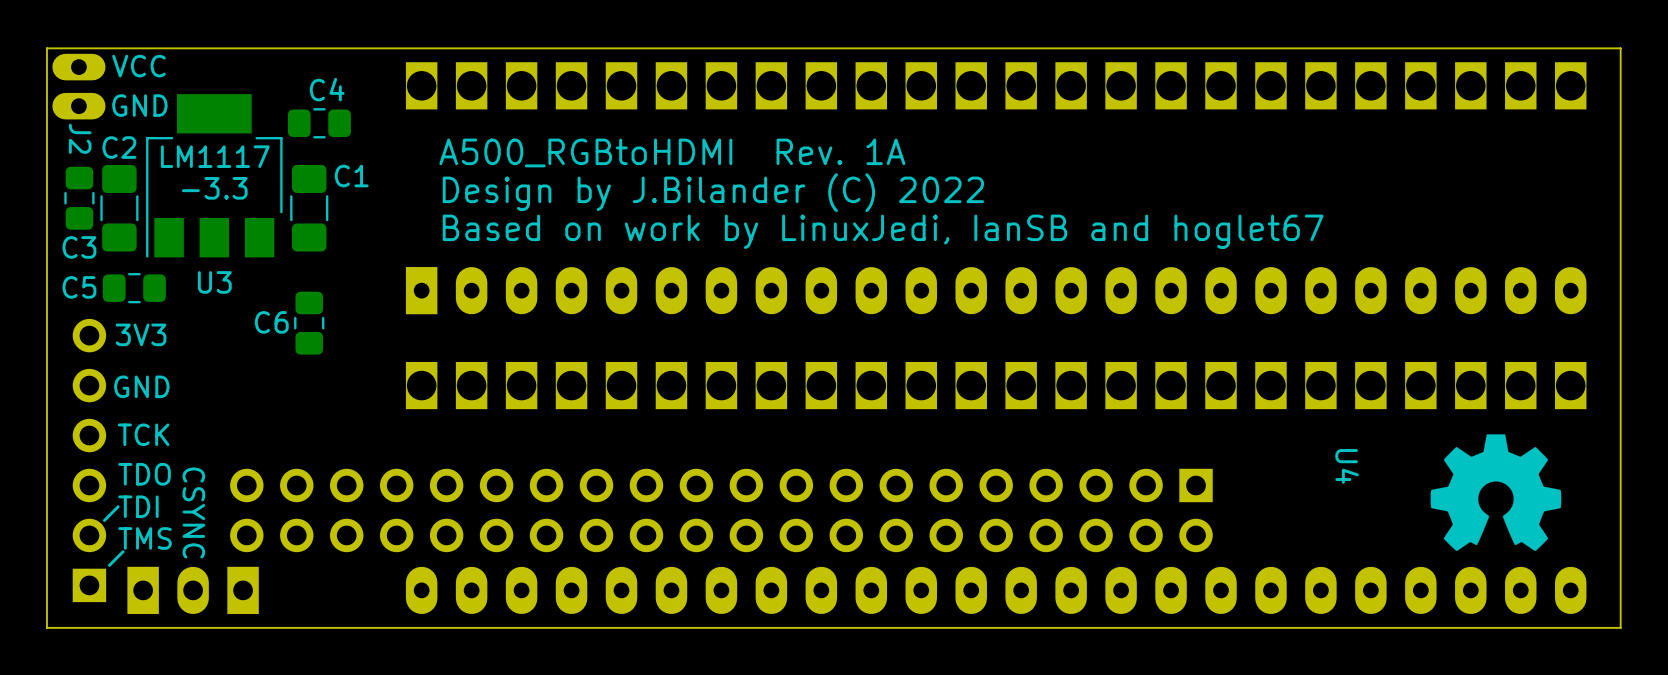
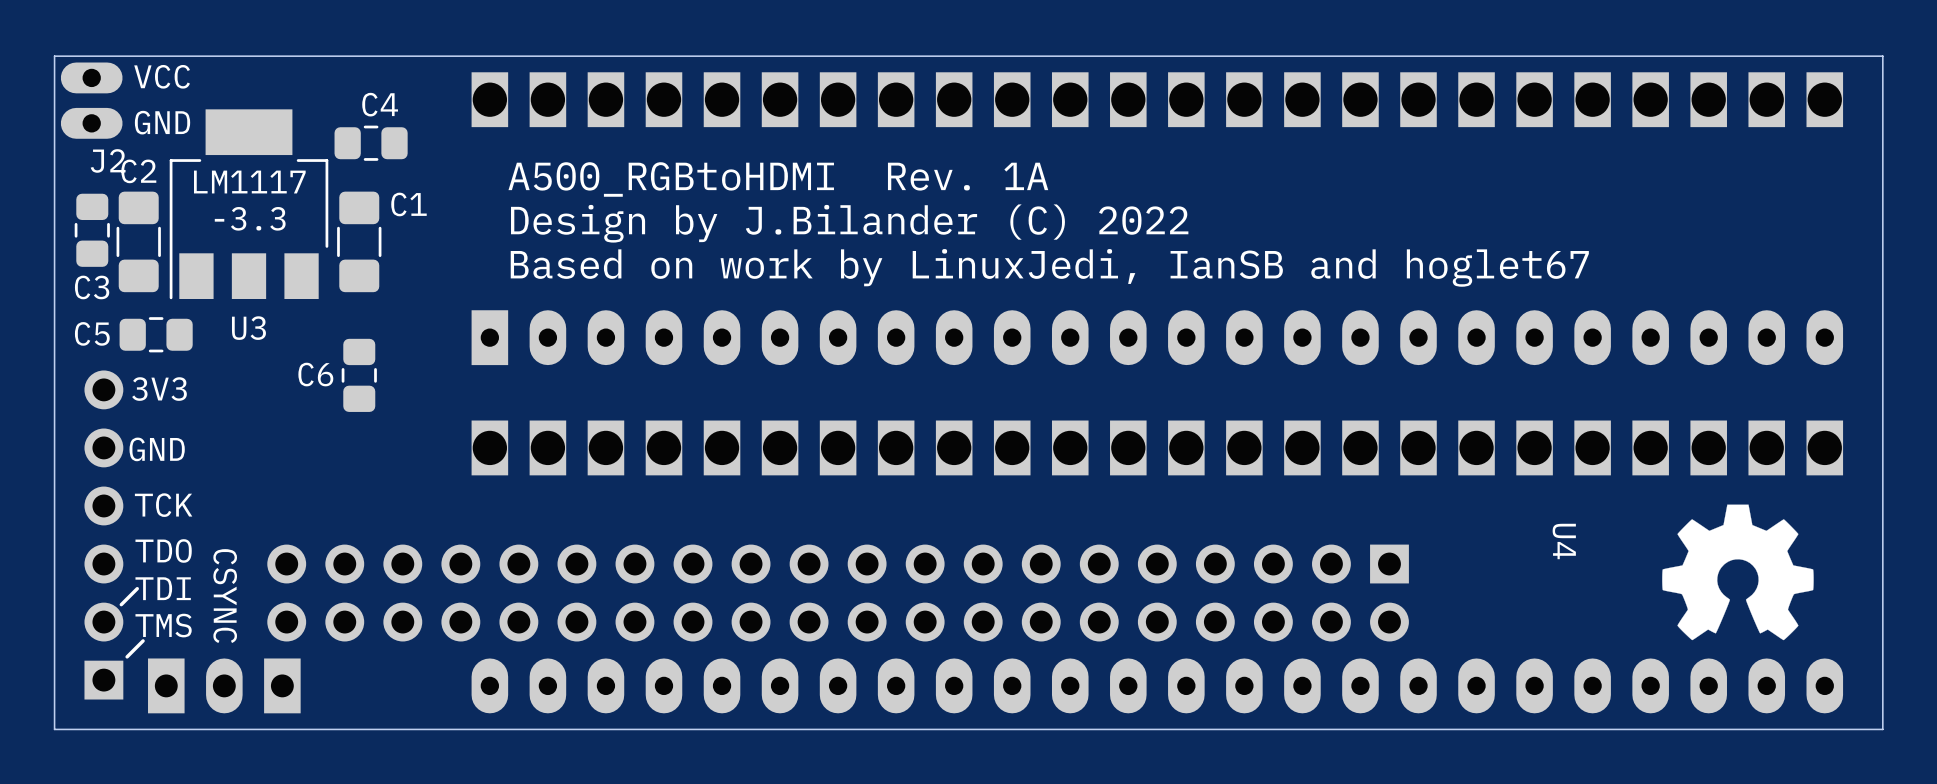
J2 name rotation: 0° (80, 138) -> 90° counterclockwise (108, 160)

